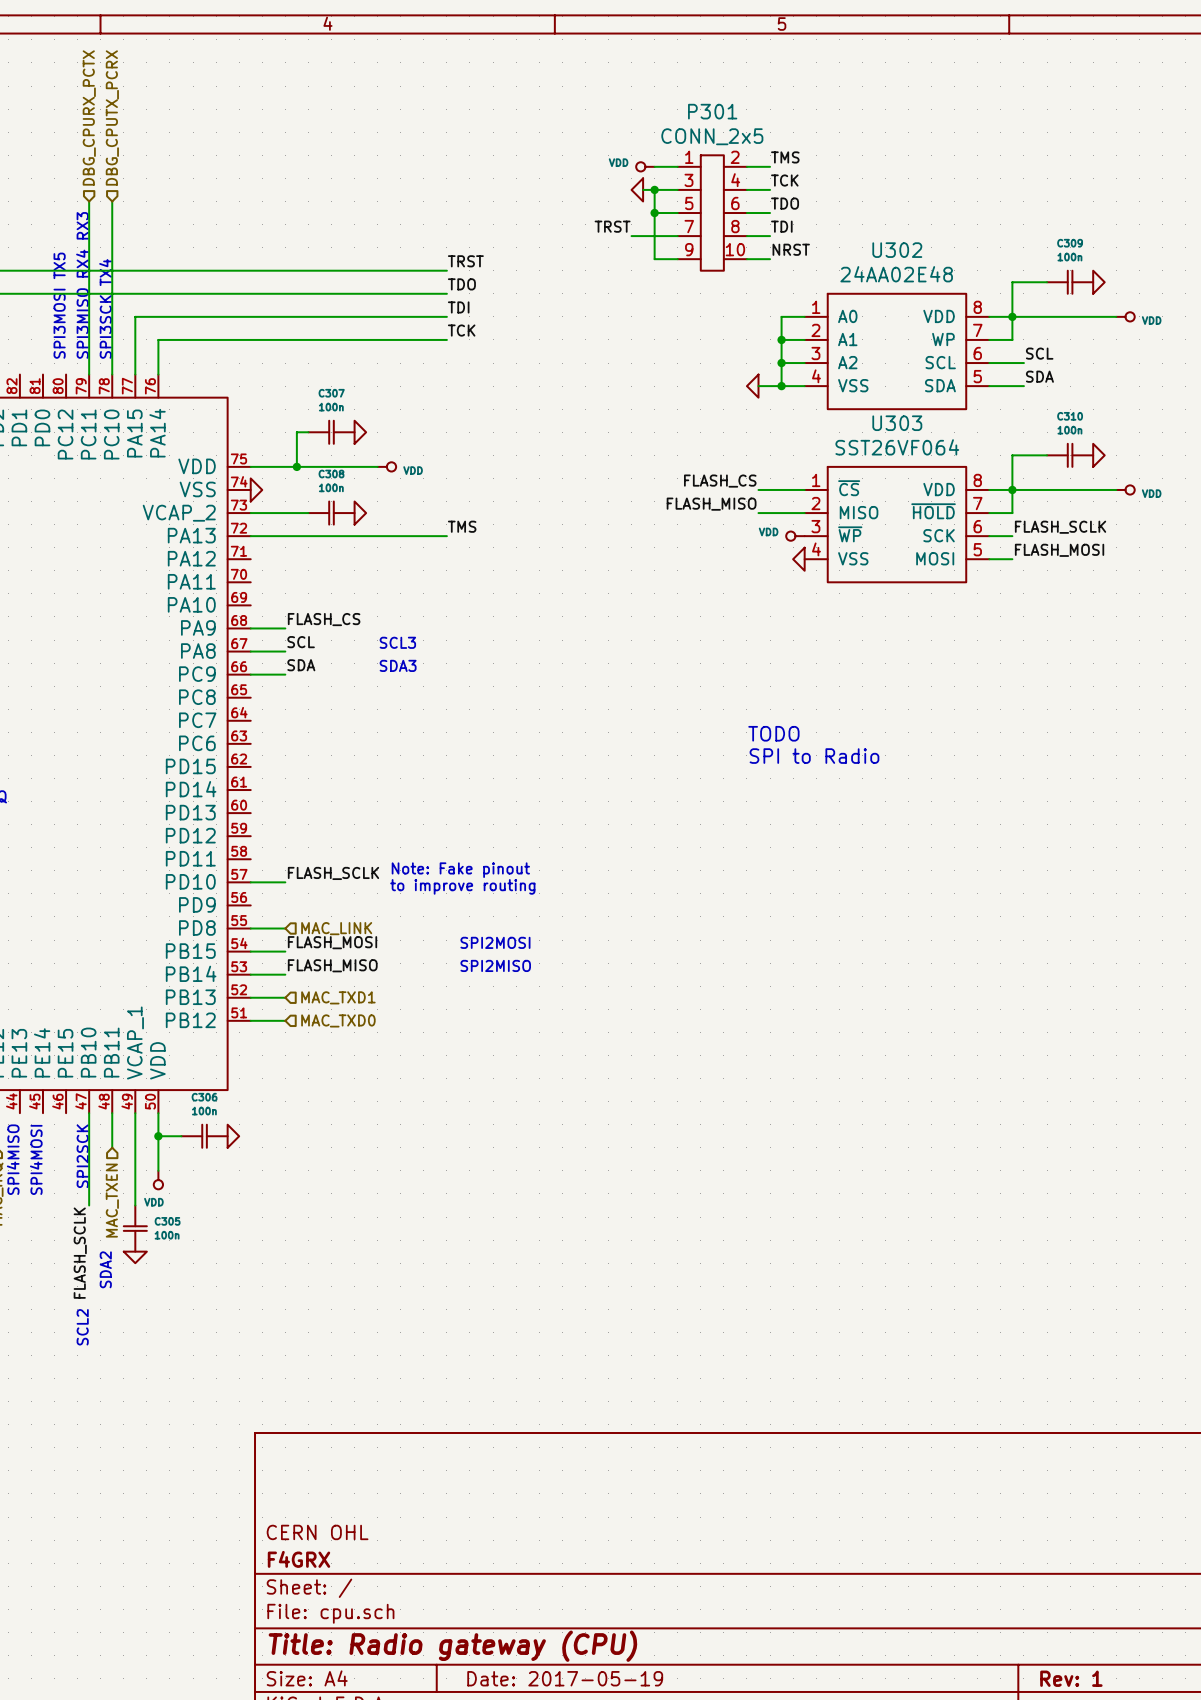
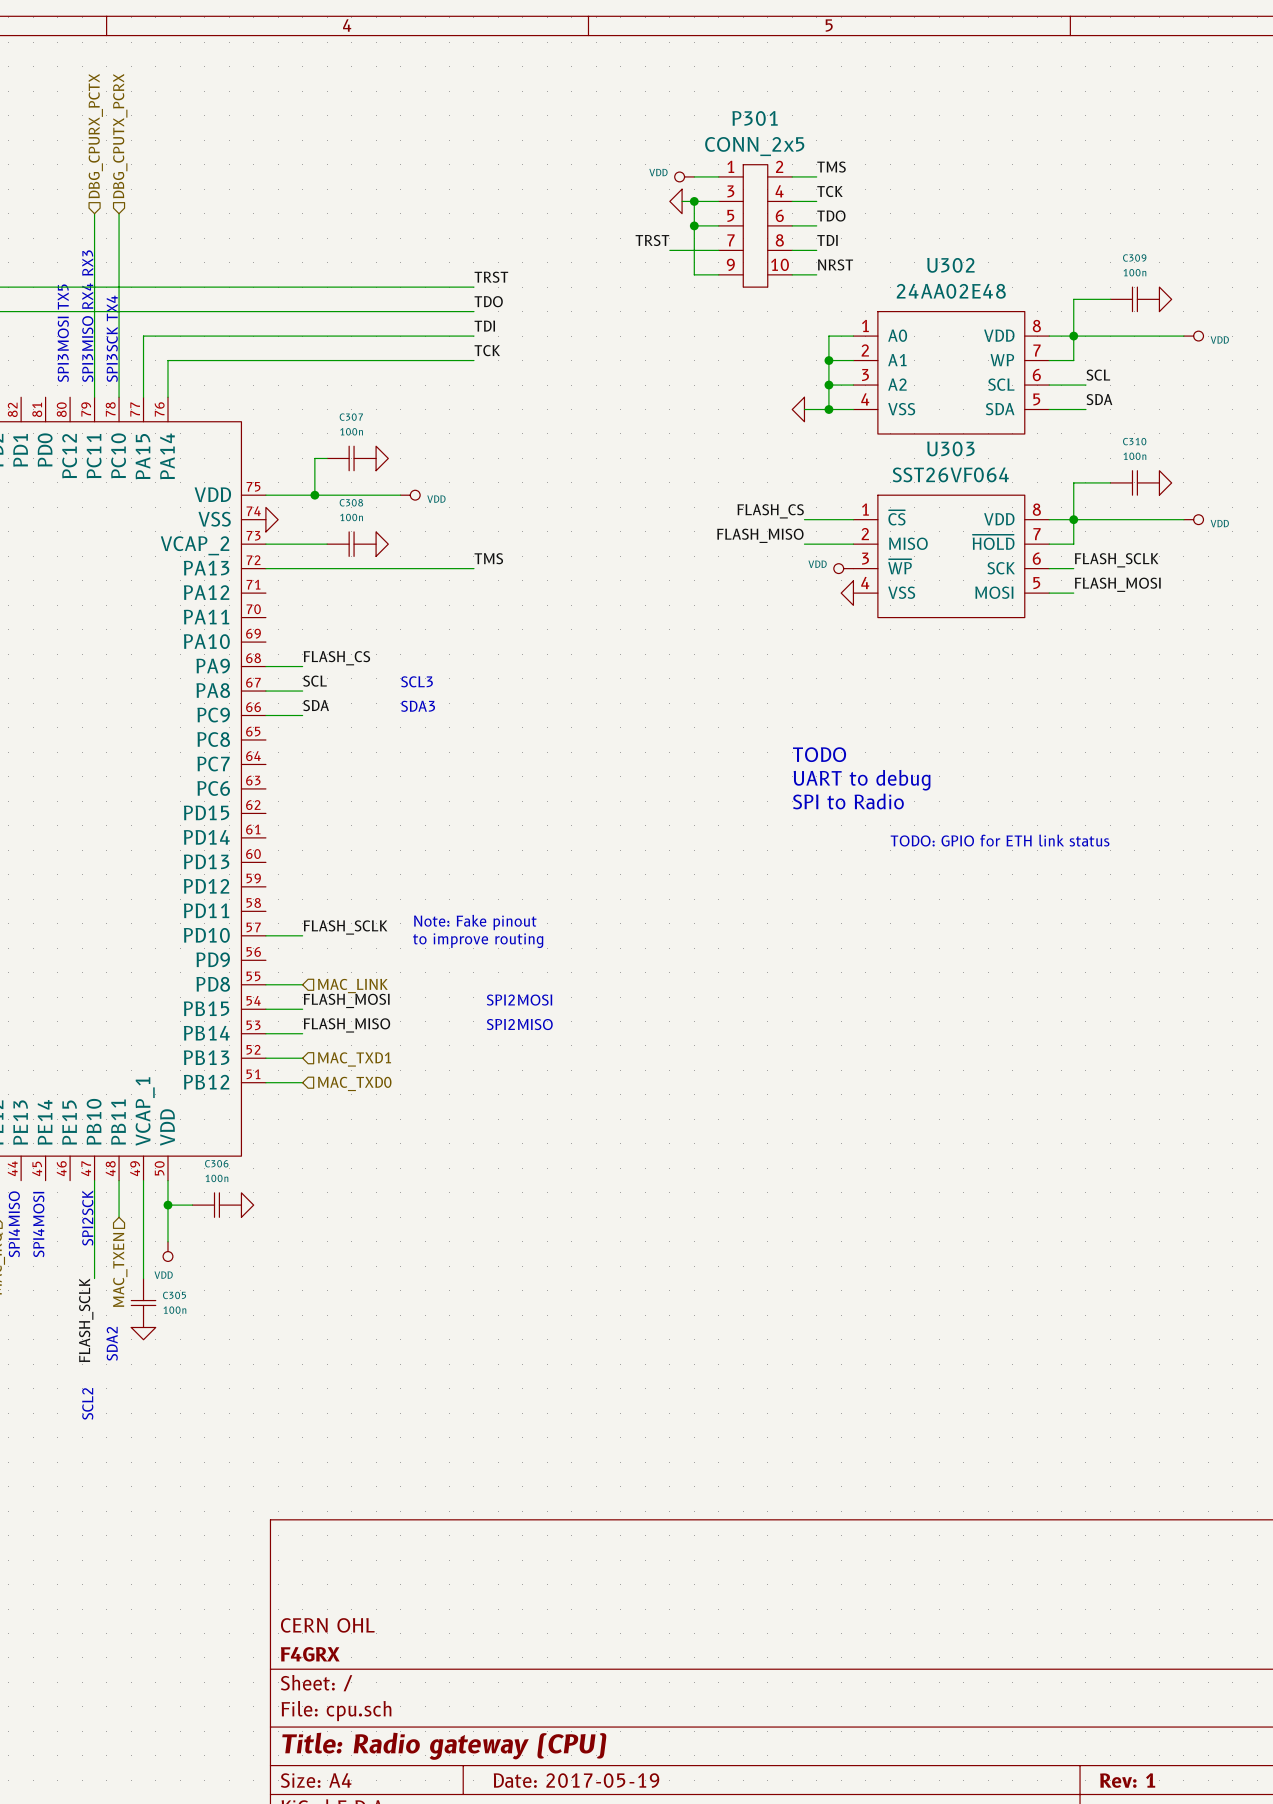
text: none -> TODO (819, 754)
text: TODO (773, 733) -> UART to debug (862, 780)
text: none -> TODO: GPIO for ETH link status (1000, 840)

